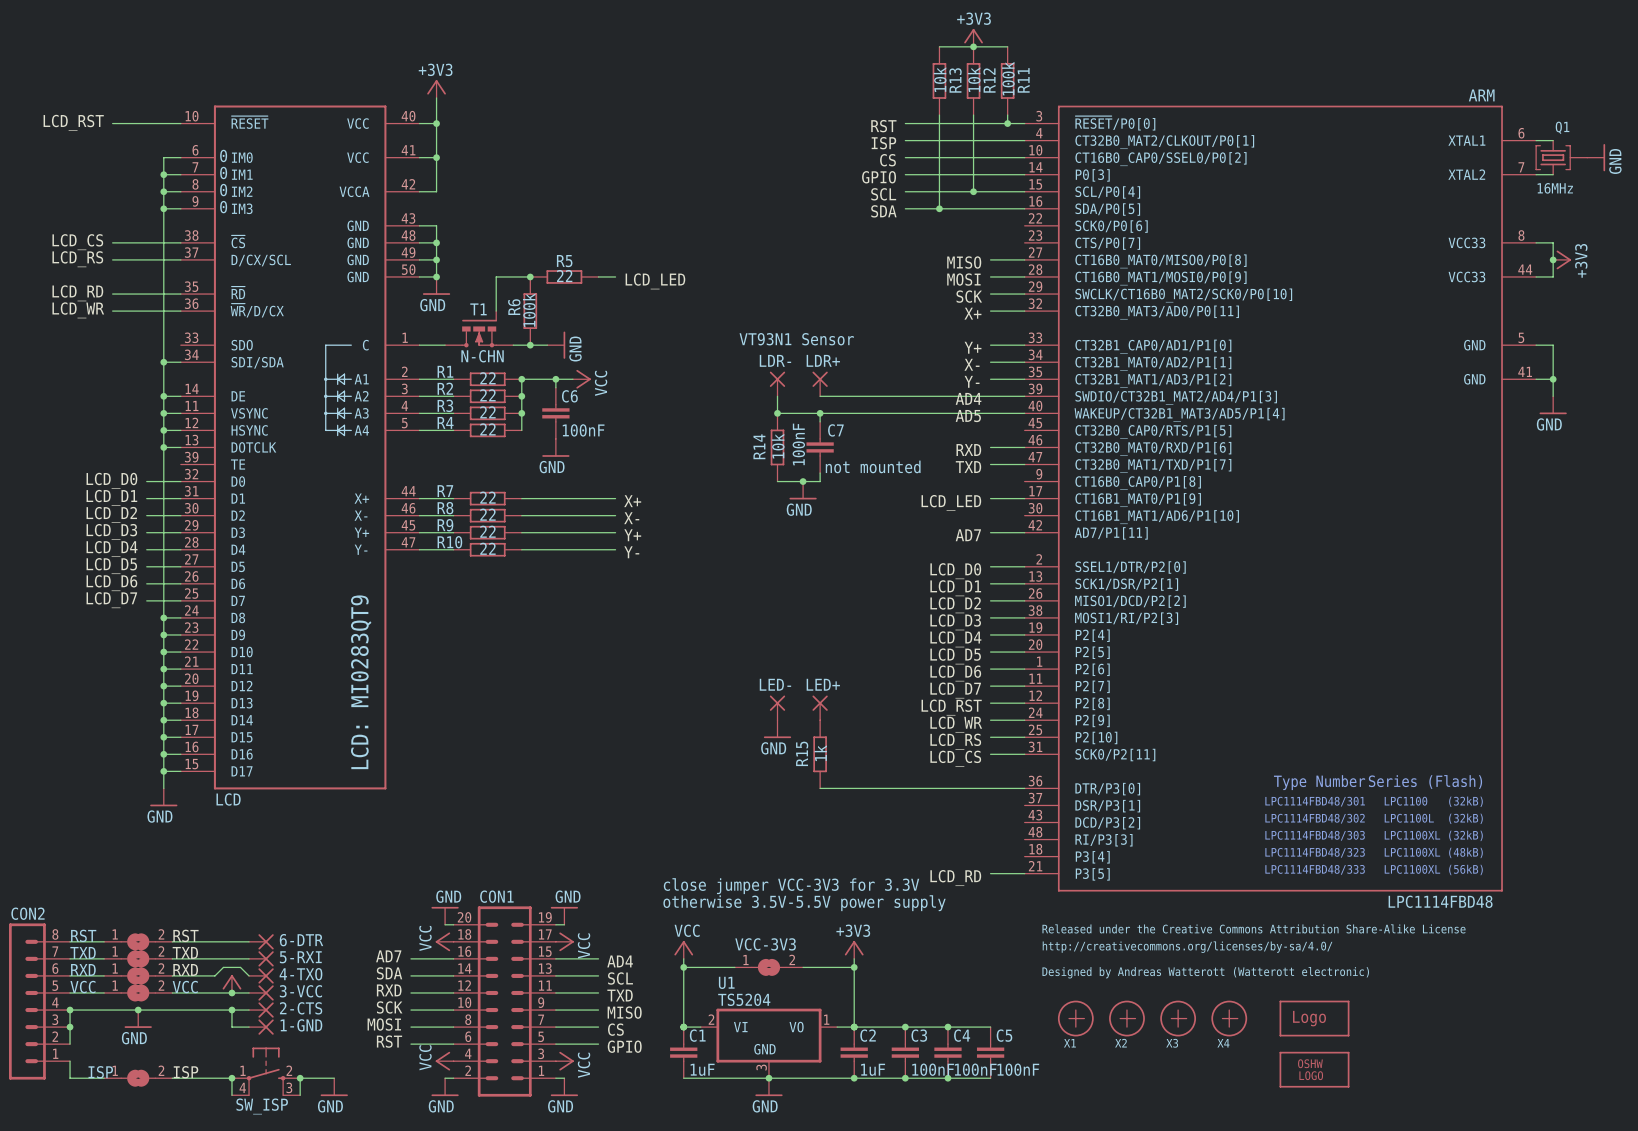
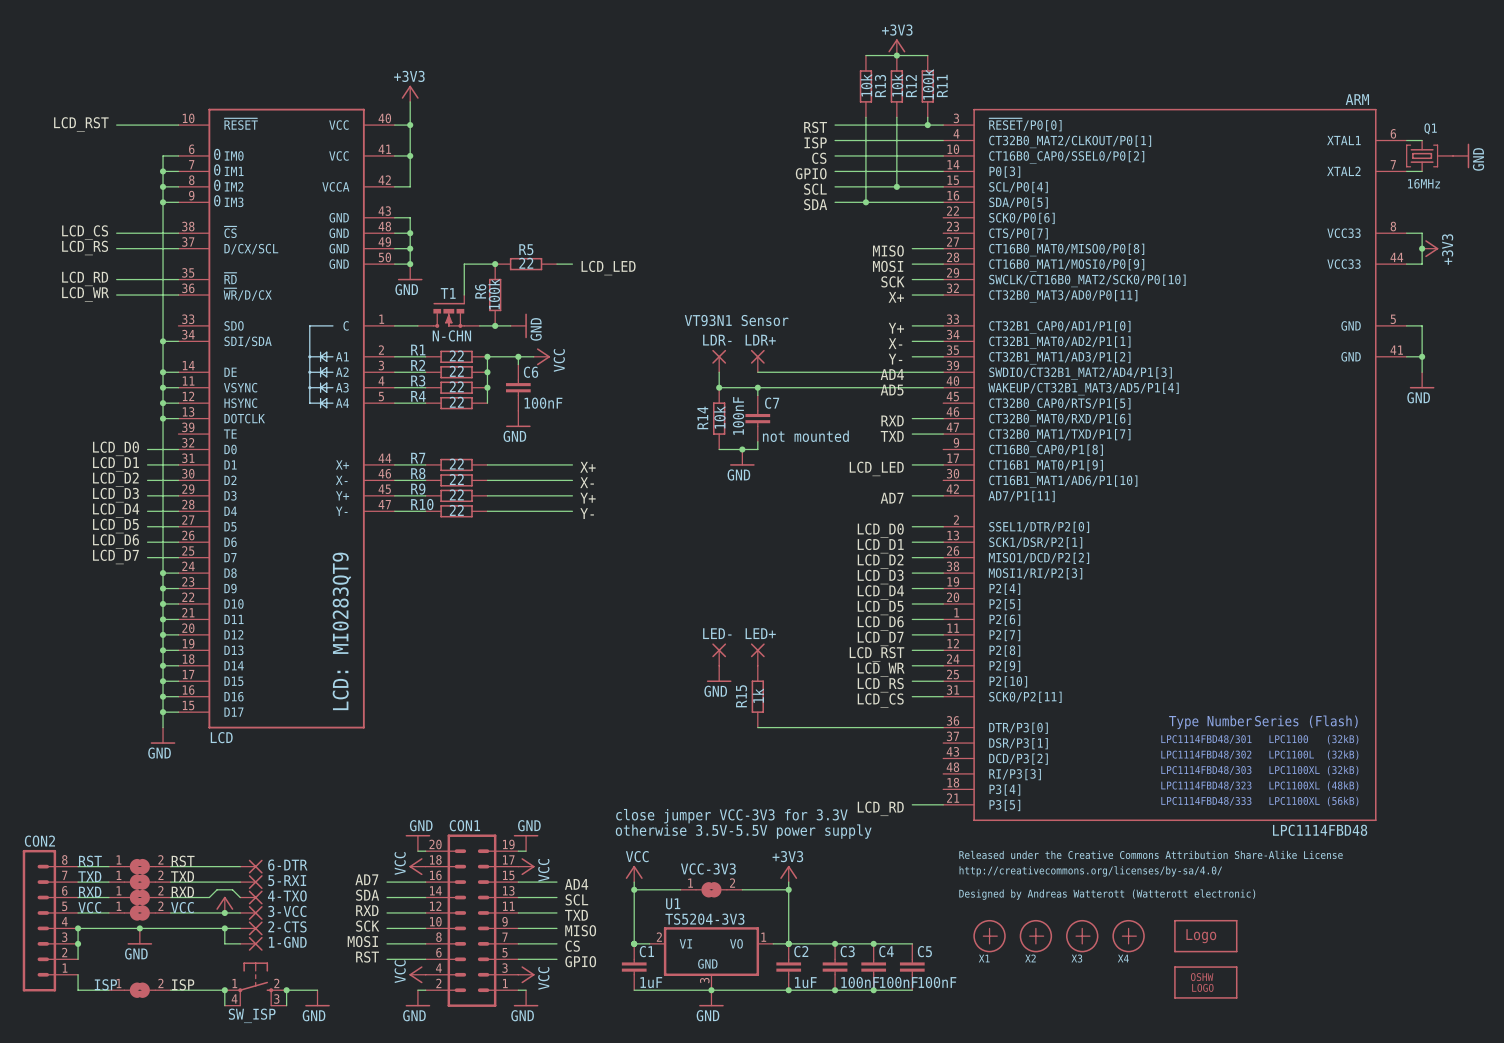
U1 value: TS5204 (744, 999) -> TS5204-3V3 (704, 919)

